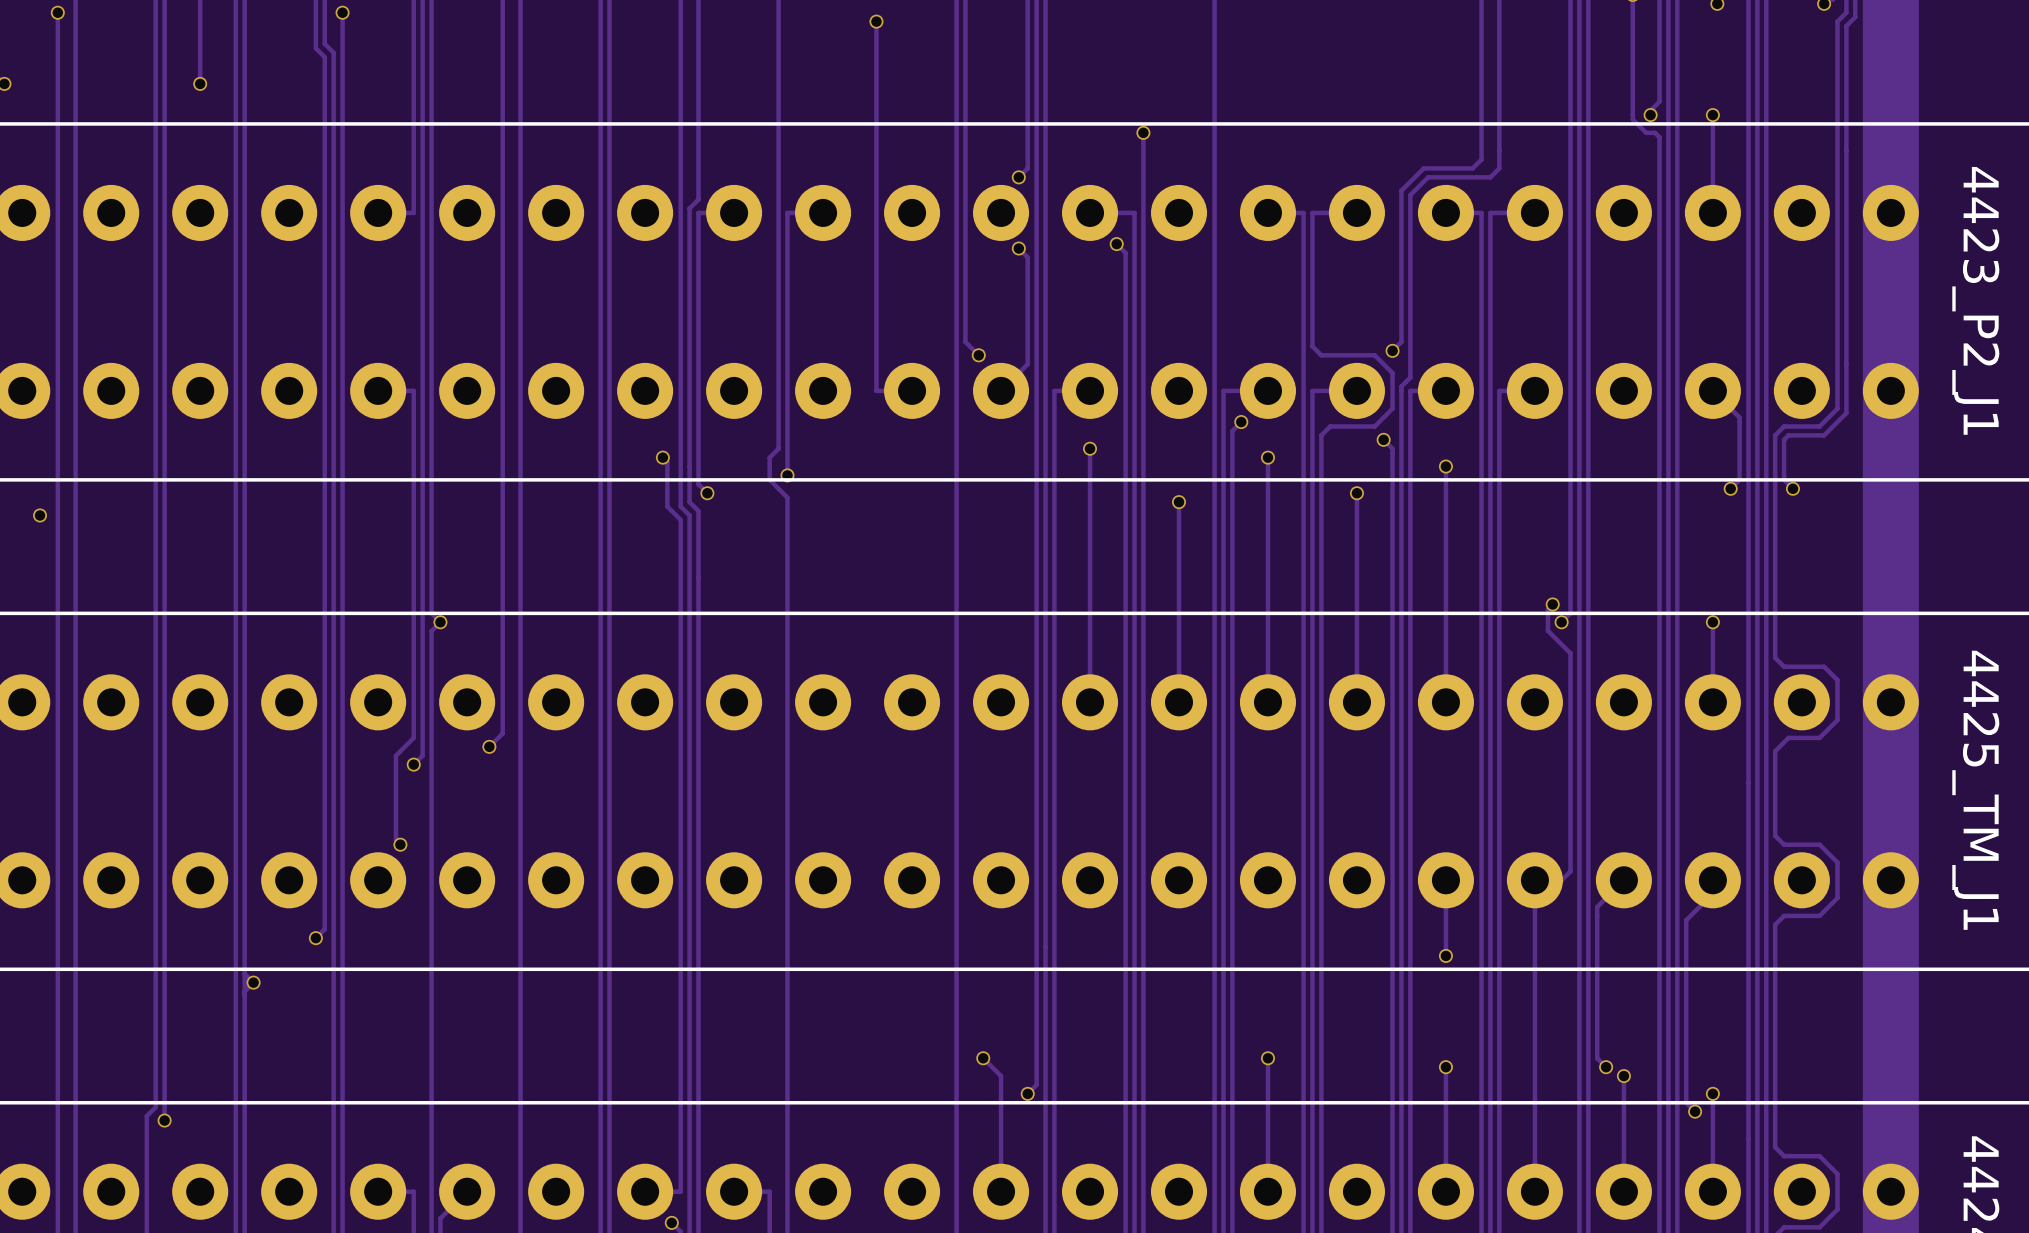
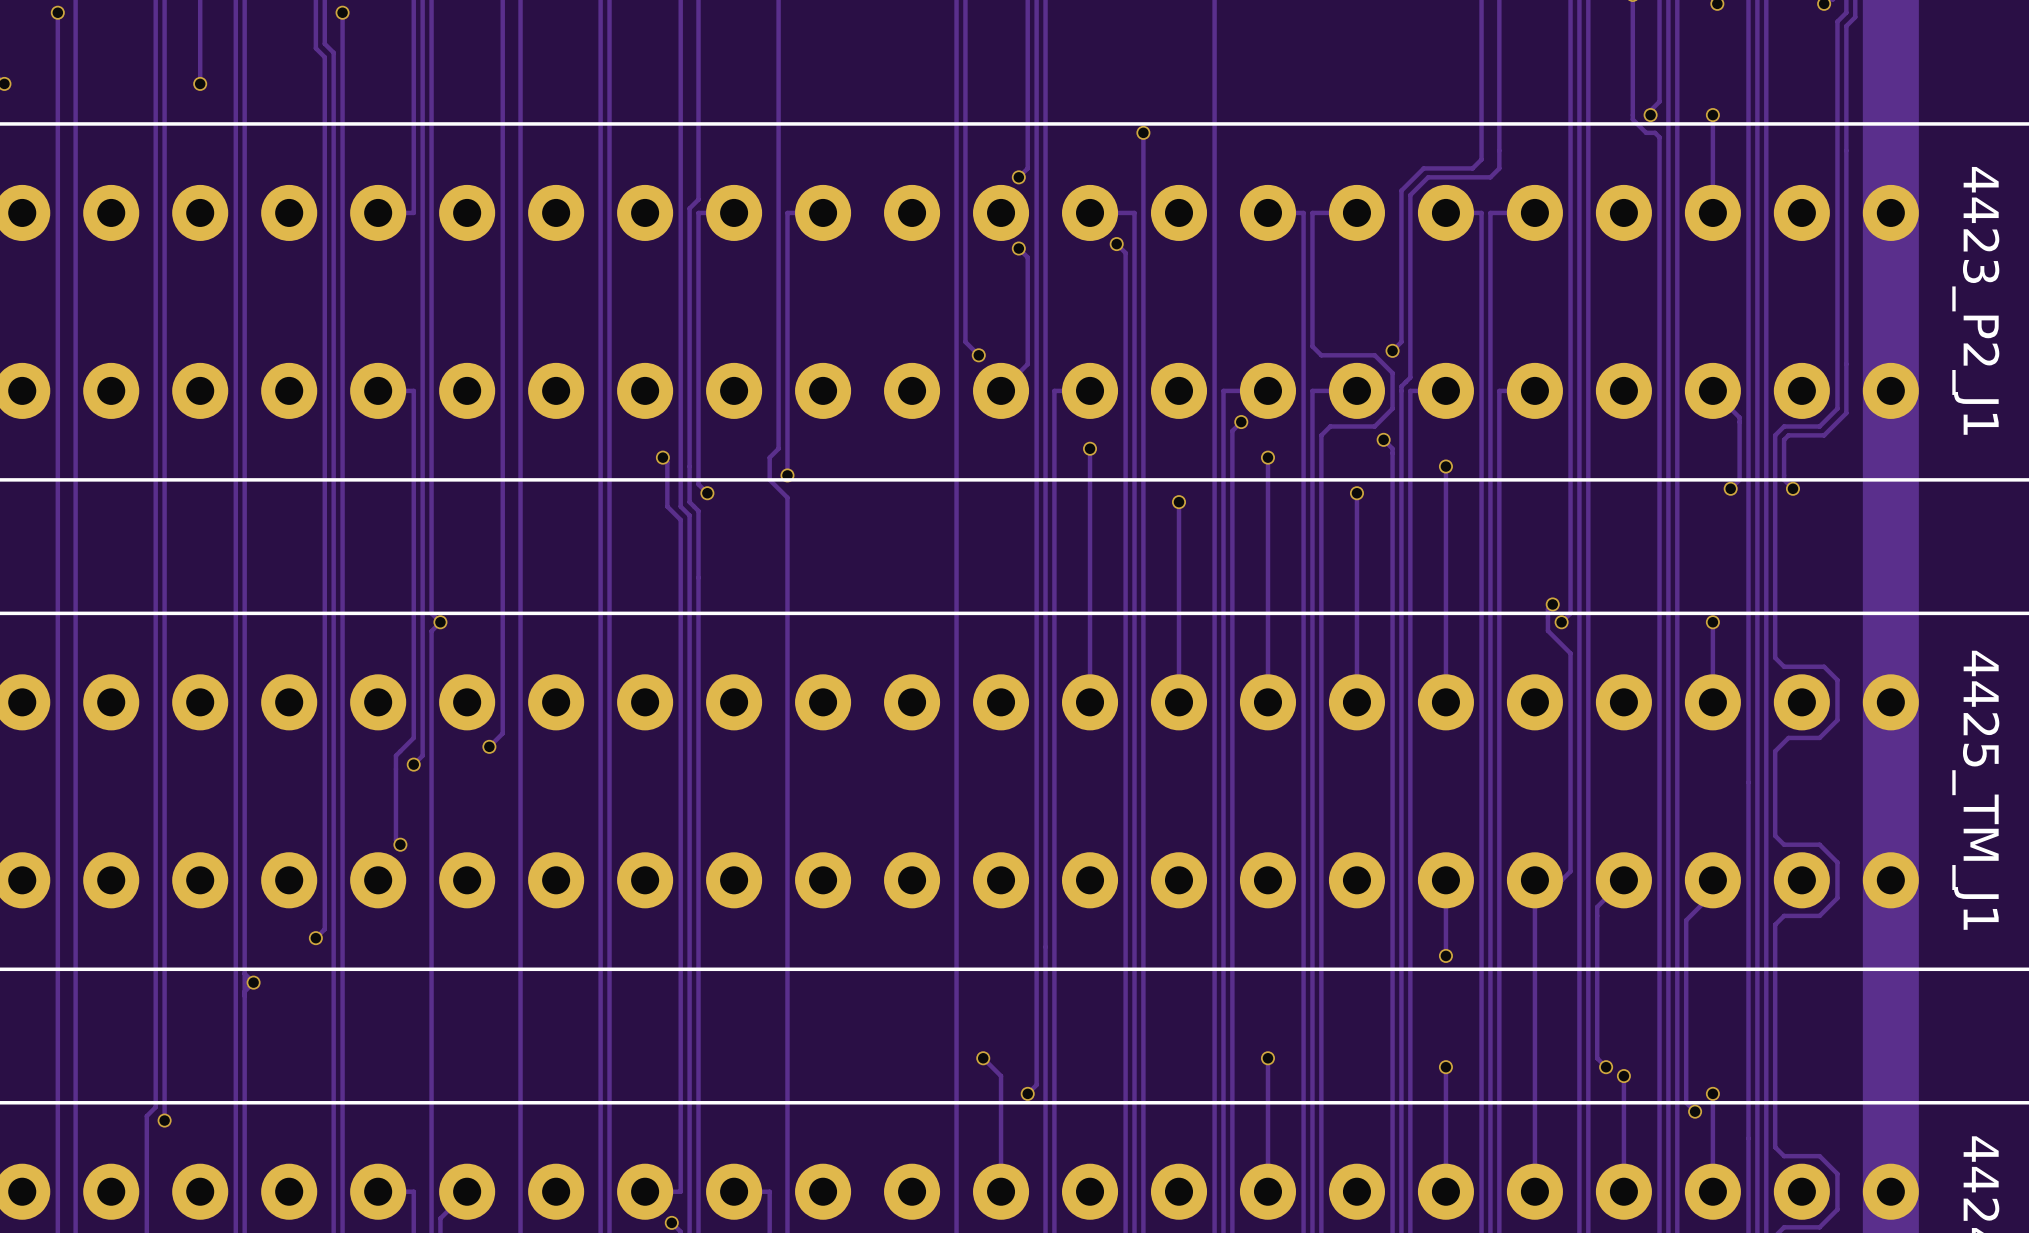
track: (876, 21) (876, 390) (912, 390) -> none
via: (876, 21) -> none
via: (40, 515) -> none

